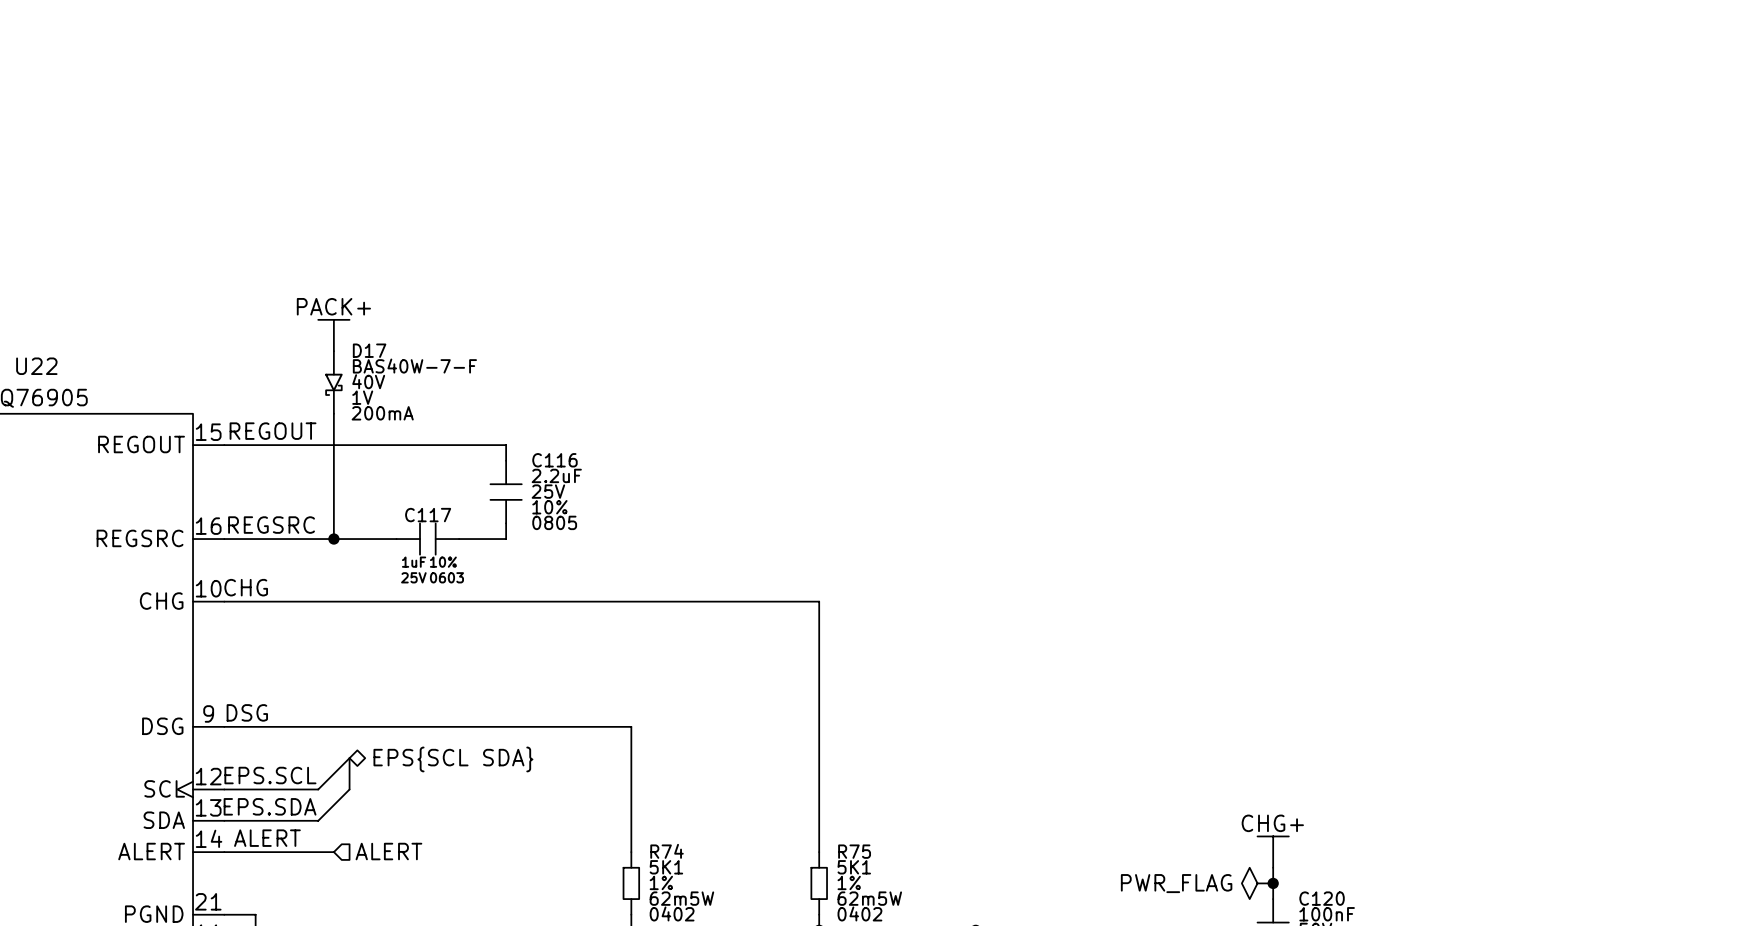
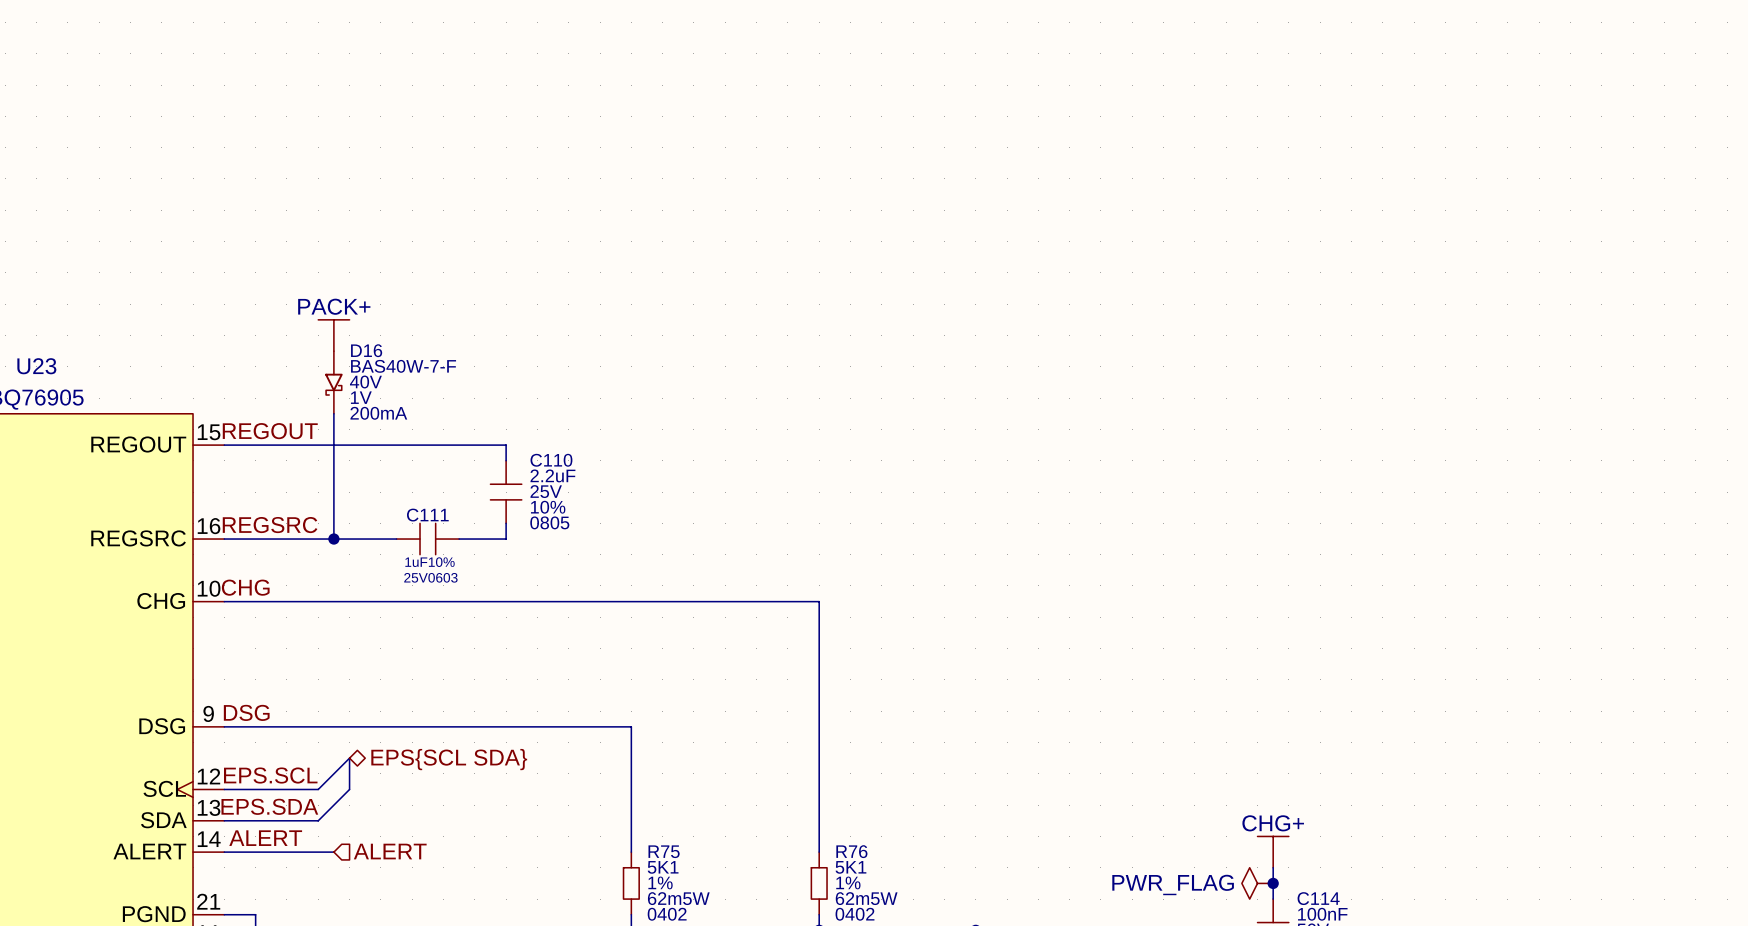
D17 name: D17 (369, 350) -> D16 (366, 350)
U22 name: U22 (36, 366) -> U23 (36, 366)
C116 name: C116 (554, 460) -> C110 (551, 460)
C117 name: C117 (428, 515) -> C111 (427, 515)
R74 name: R74 (667, 851) -> R75 (664, 851)
R75 name: R75 (854, 851) -> R76 (851, 851)
C120 name: C120 (1322, 898) -> C114 (1318, 898)

